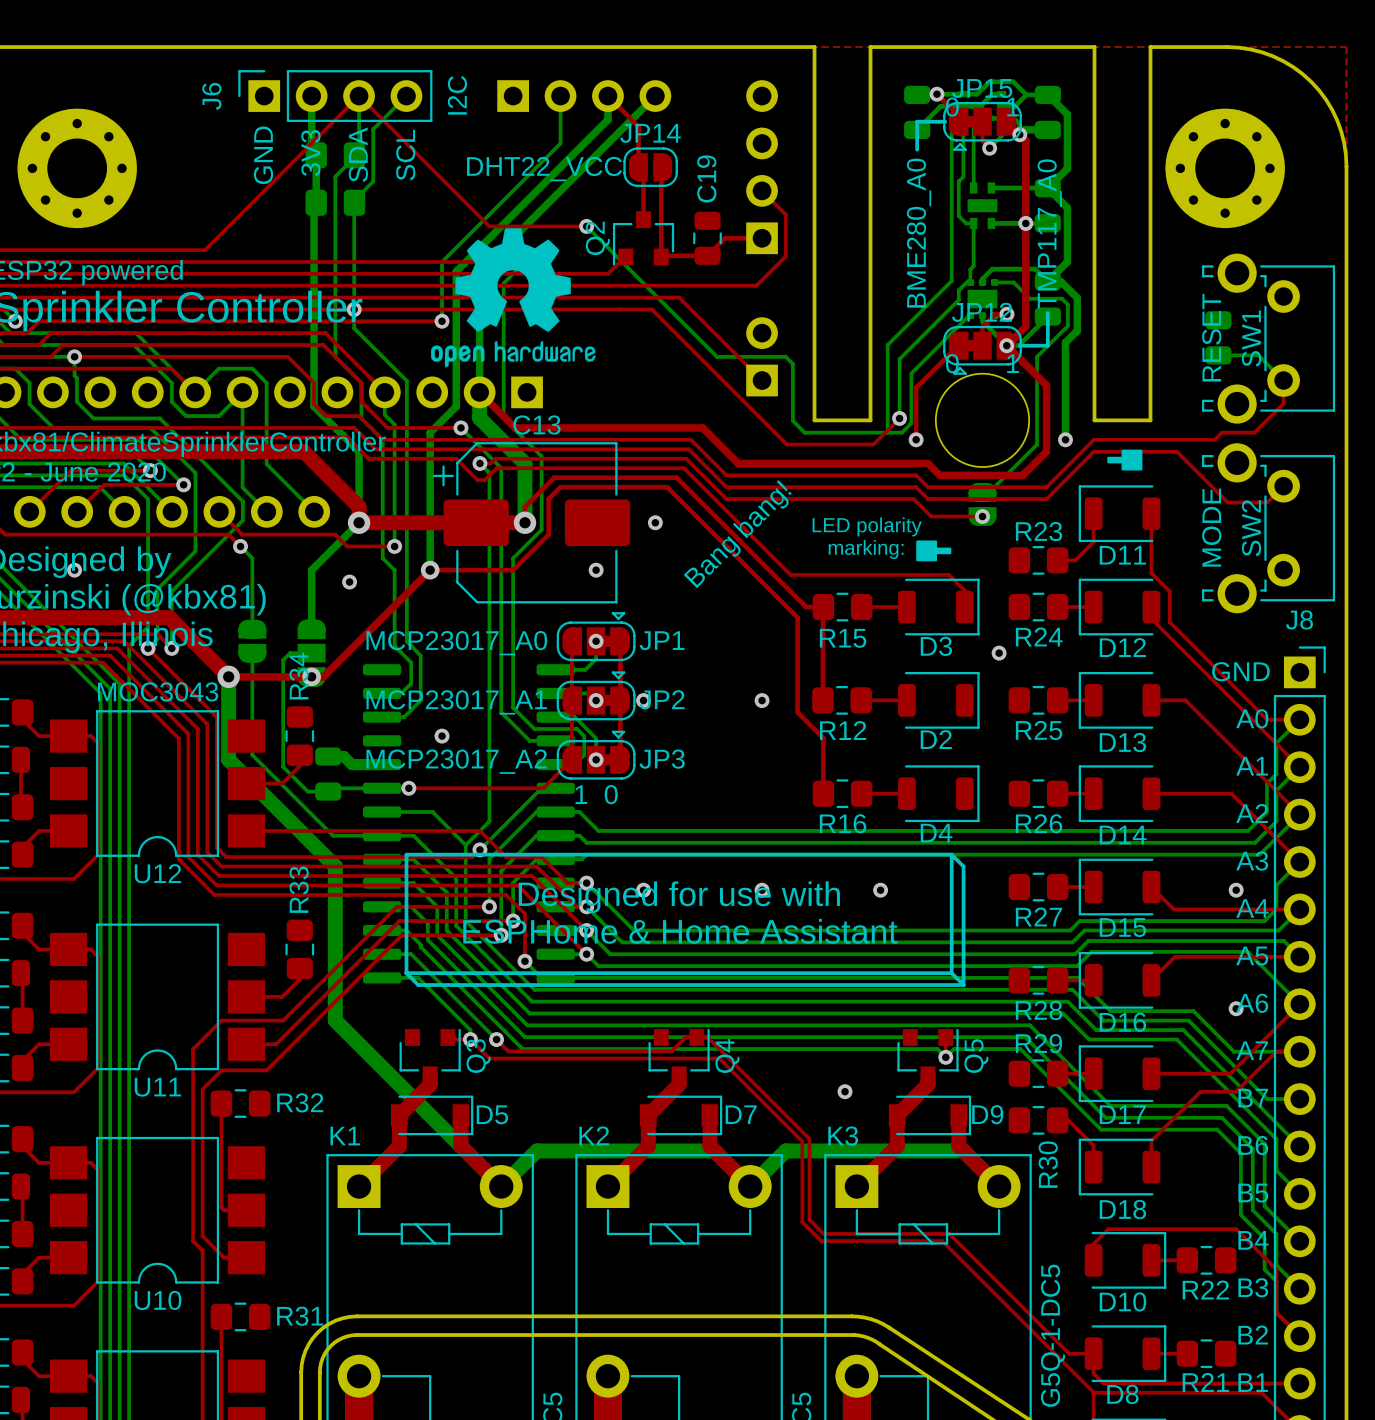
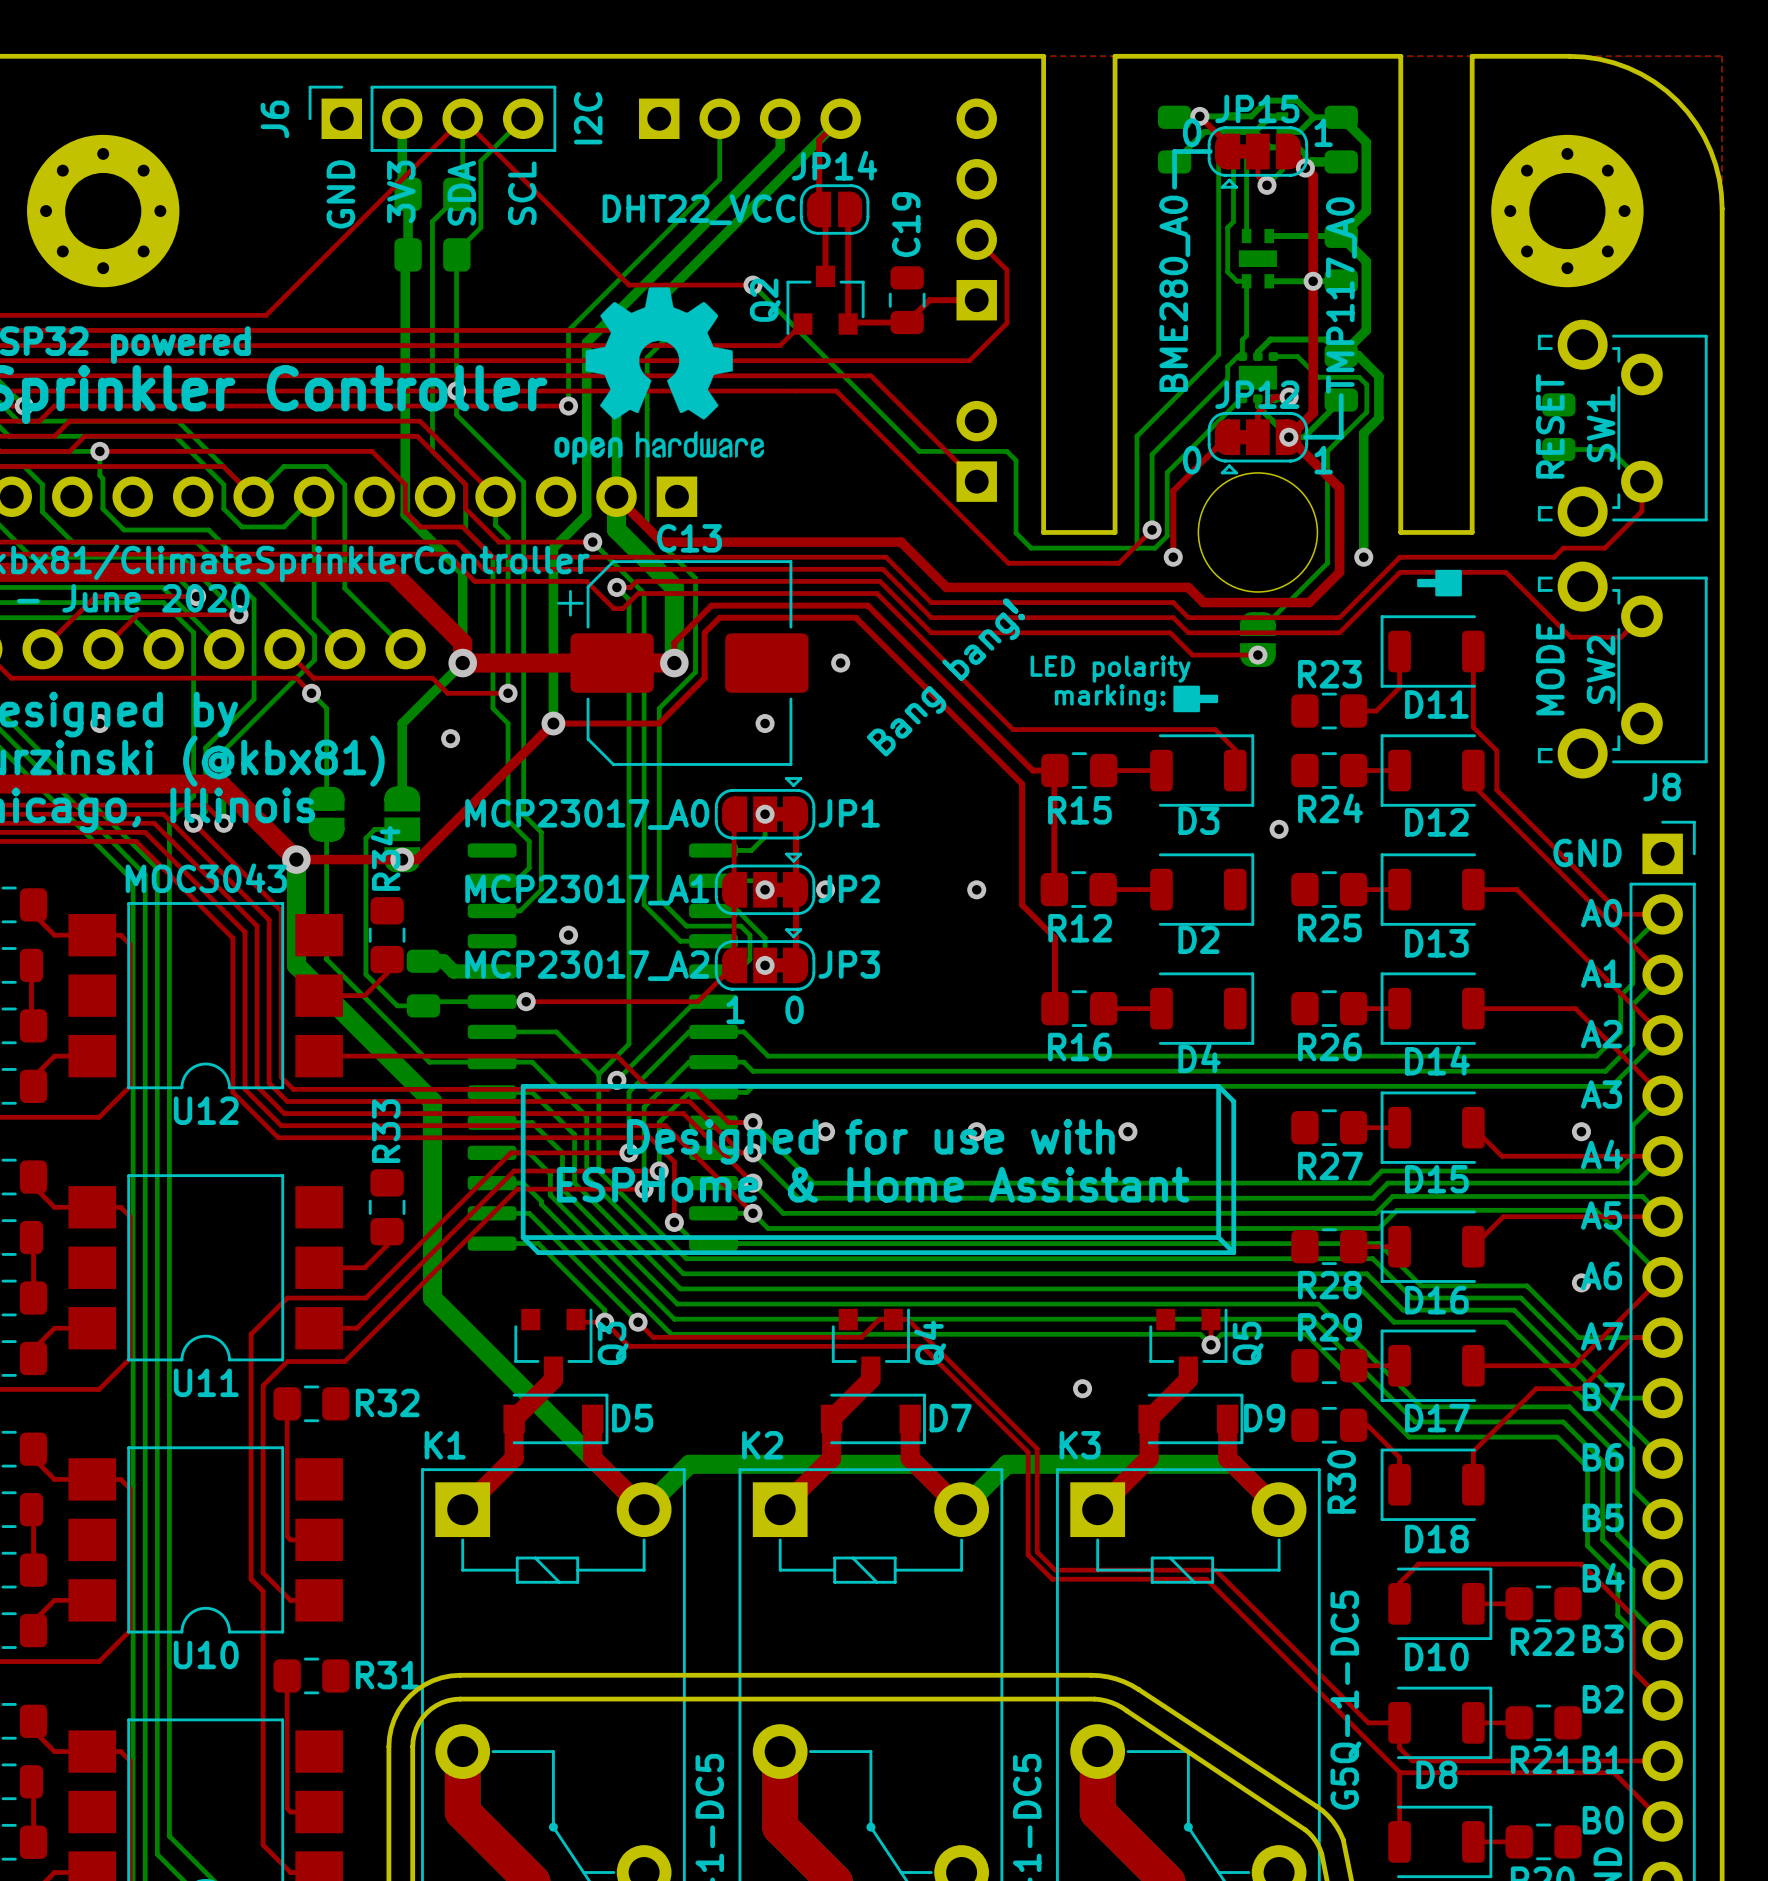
top track: (607, 96) (638, 126) -> (840, 118) (819, 140) (819, 157)

